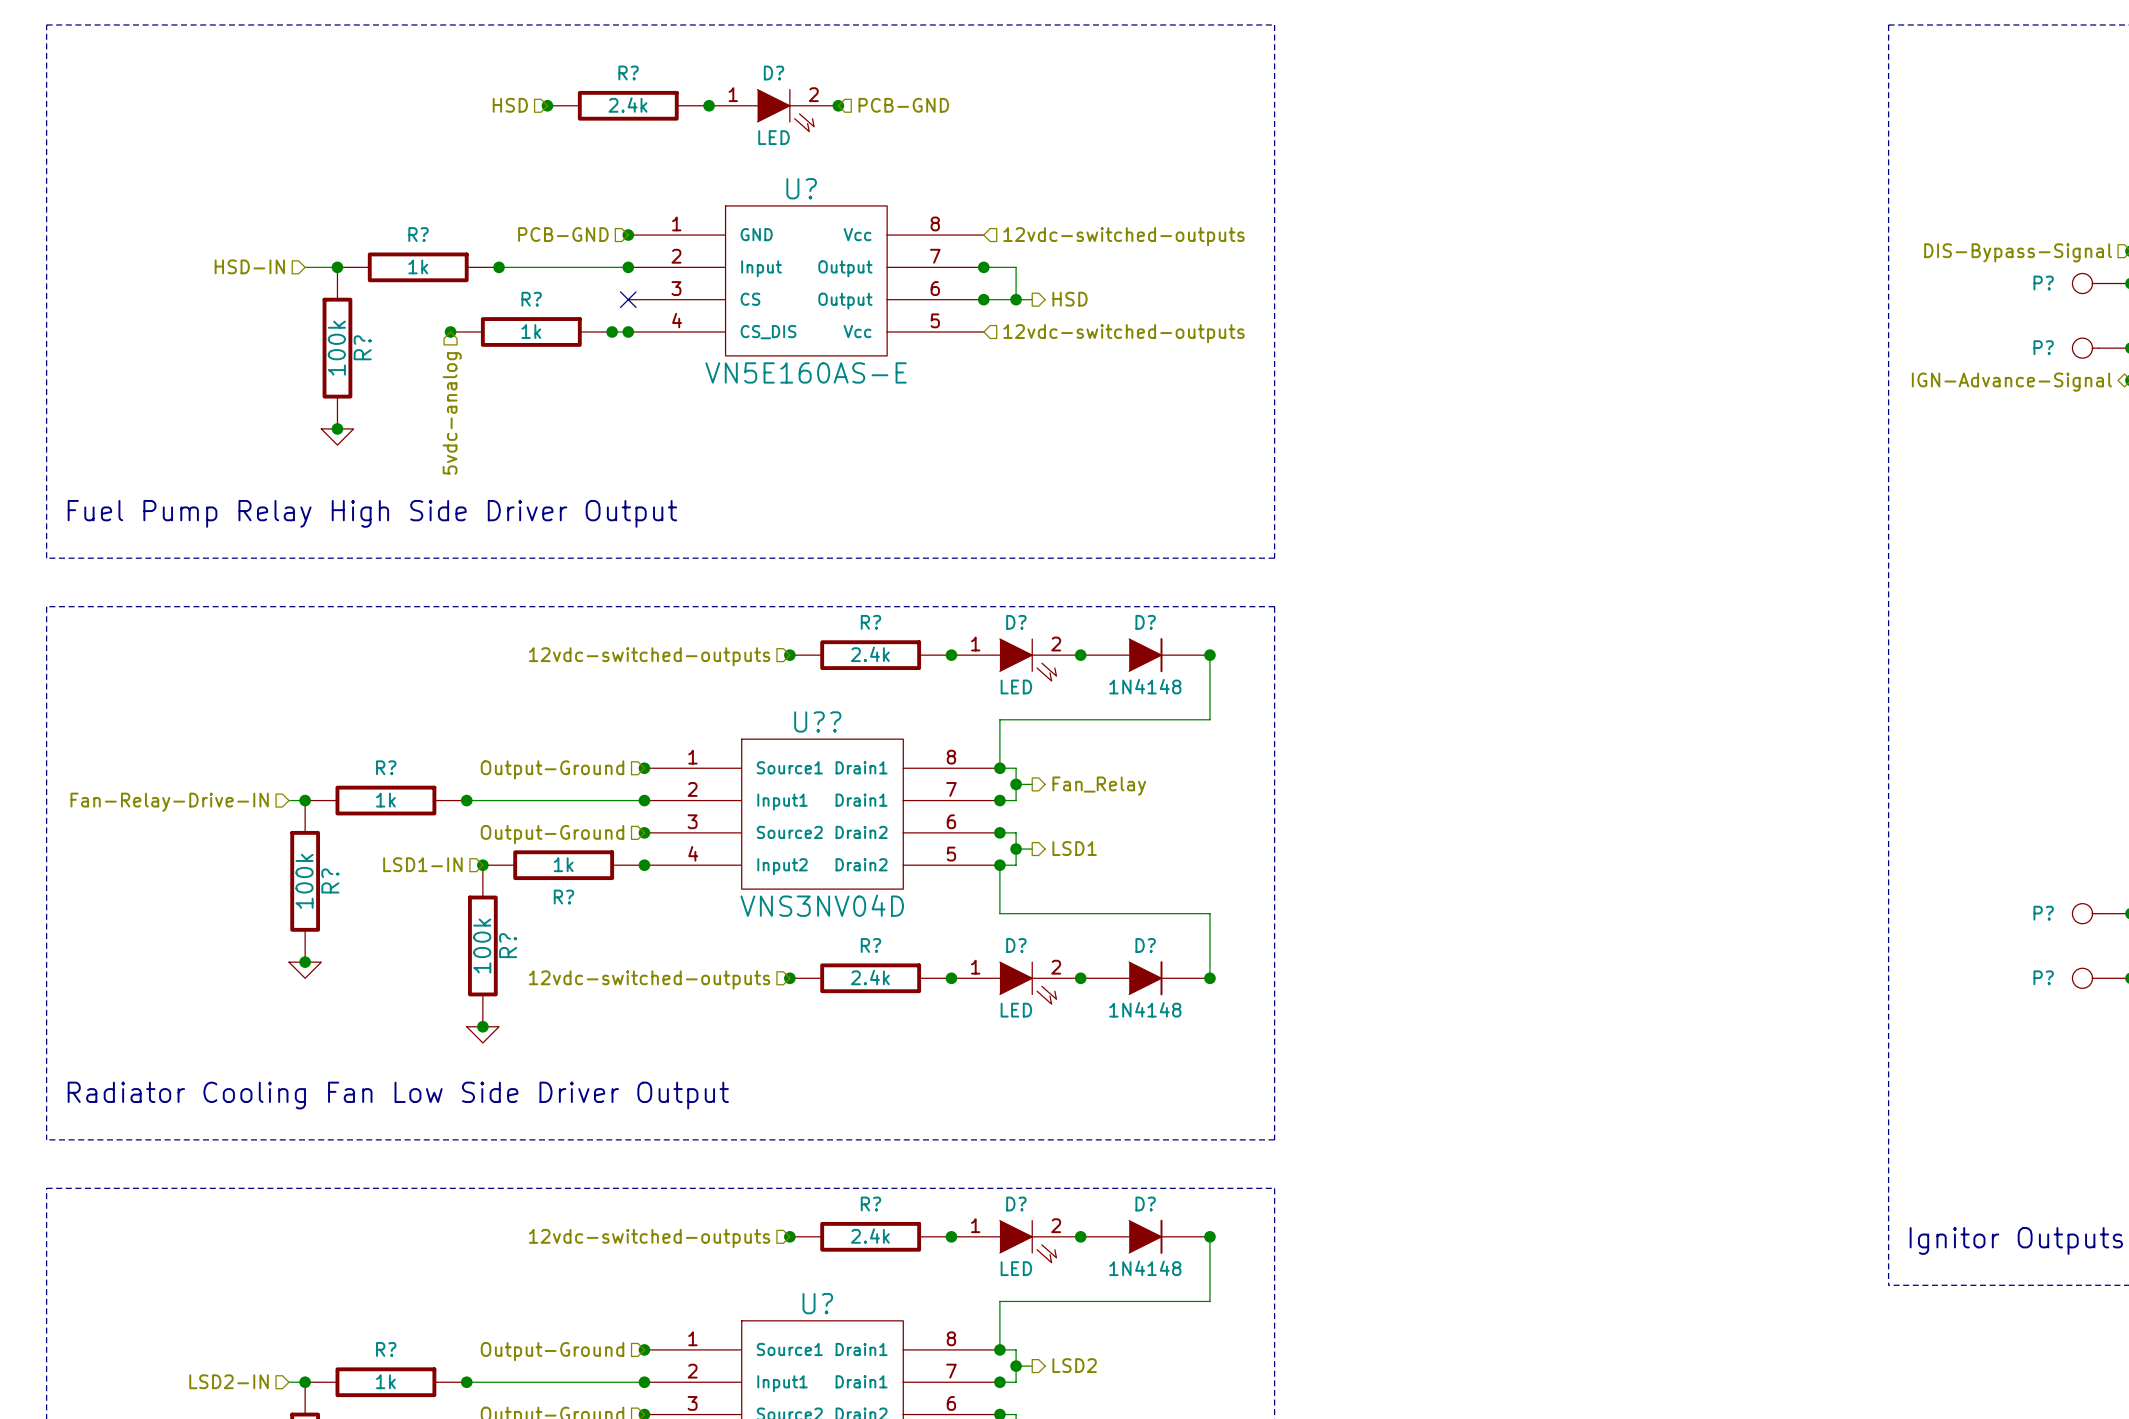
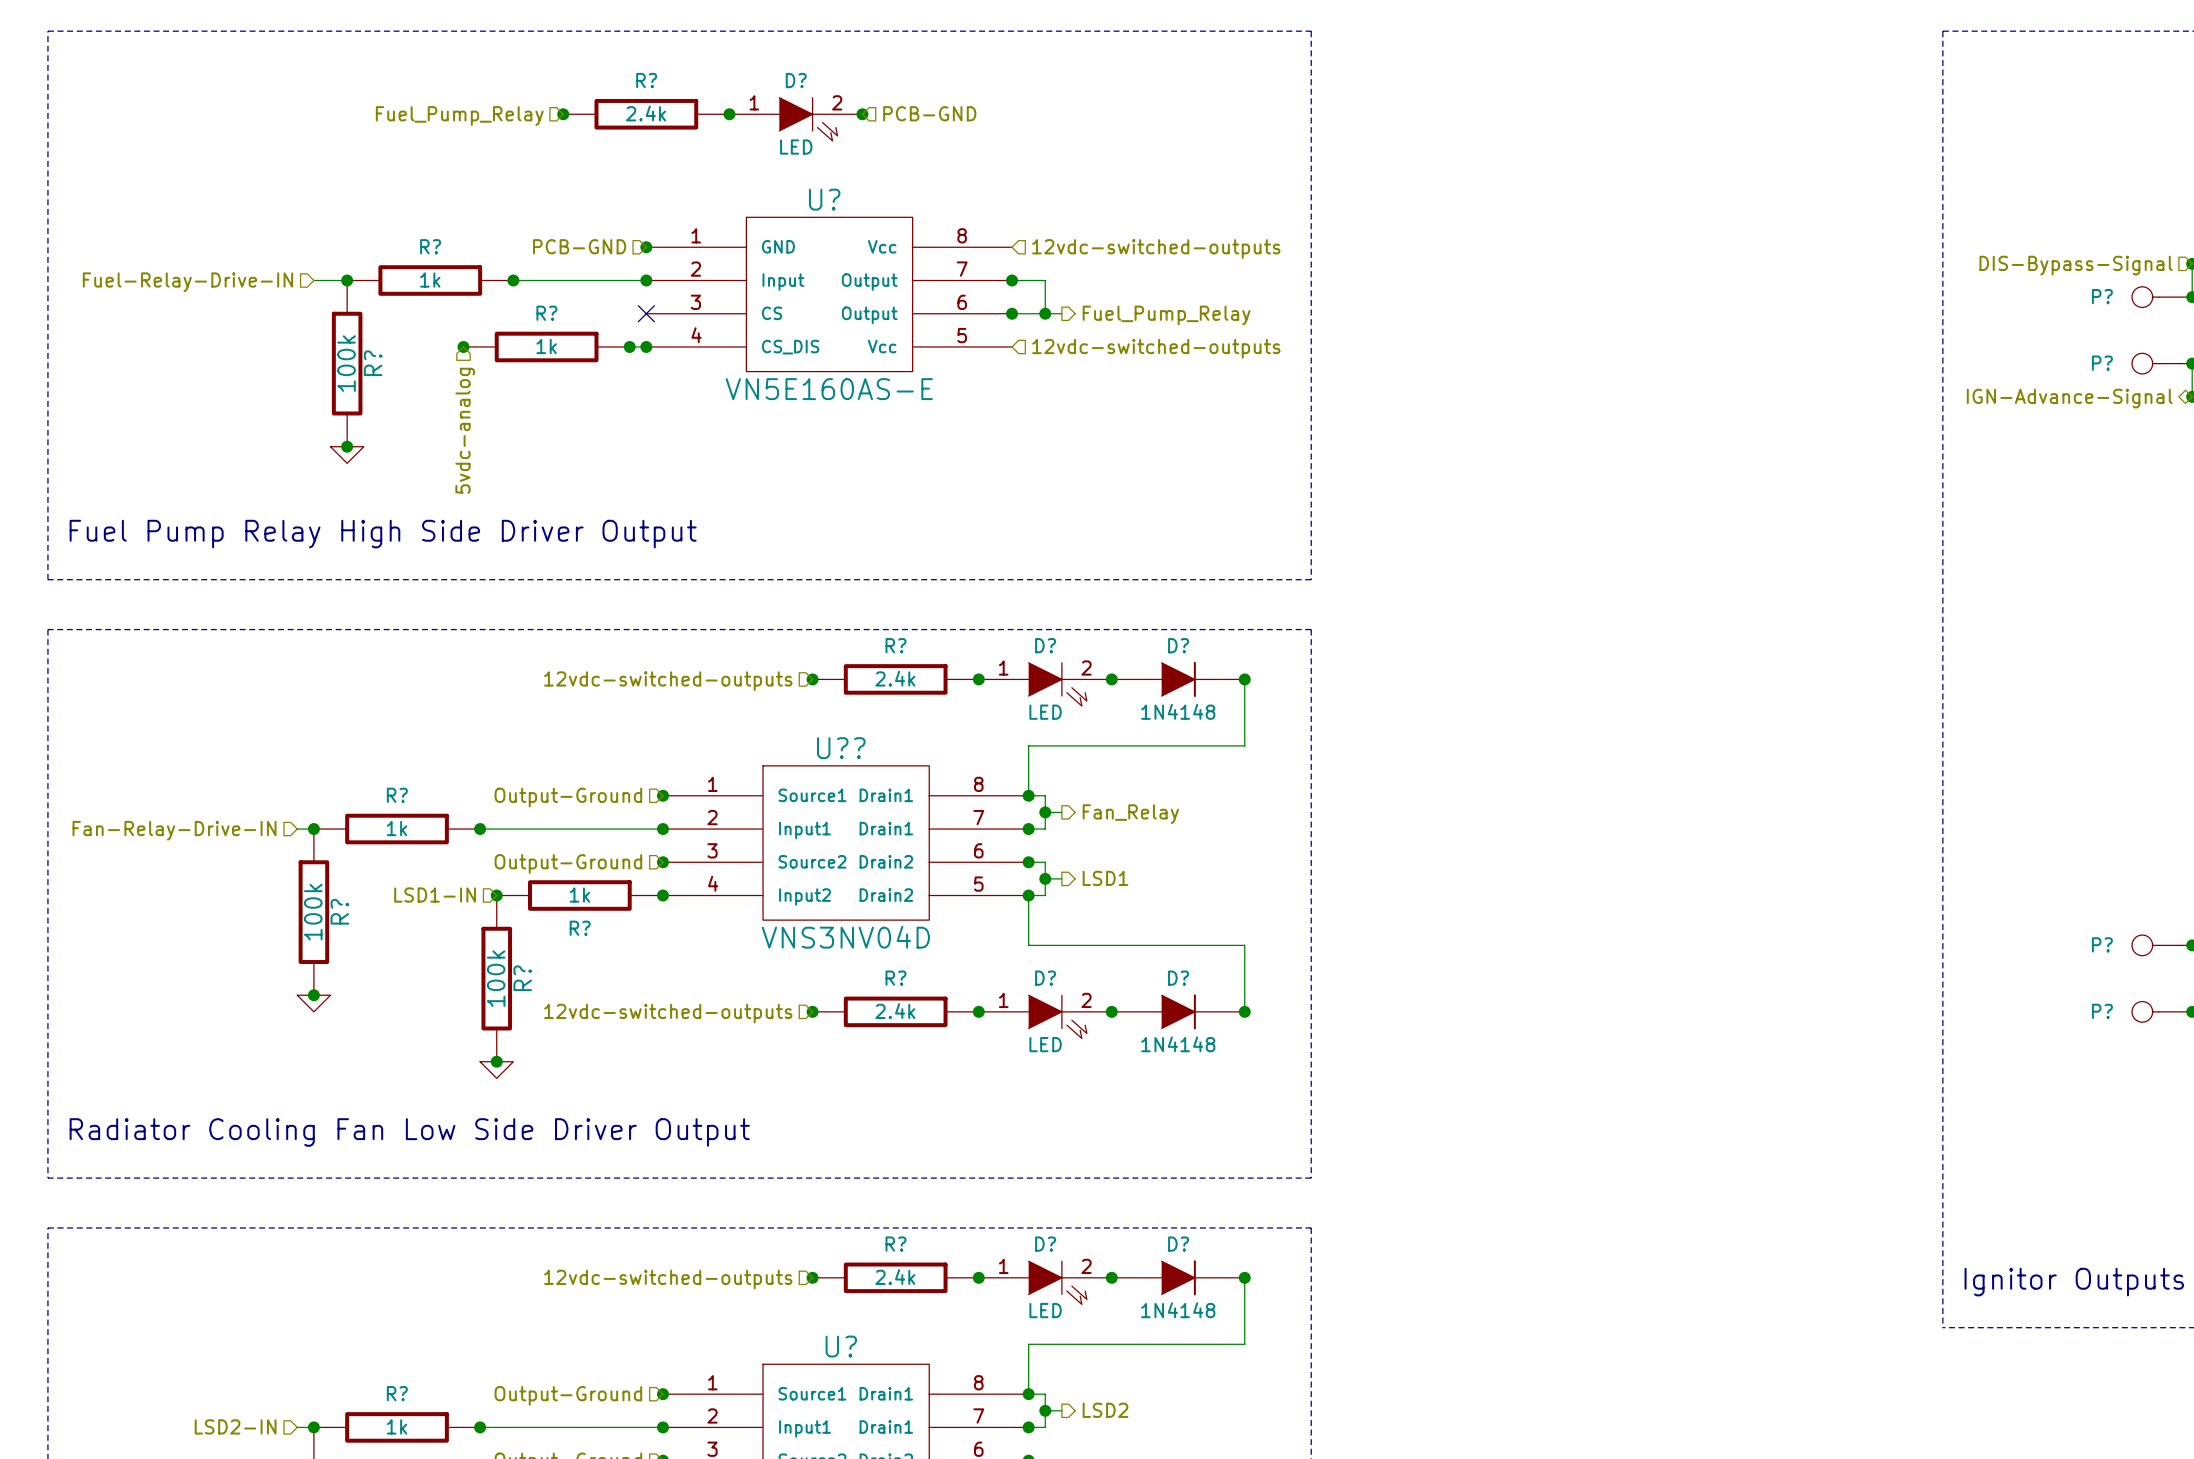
hierarchical label: HSD (510, 105) -> Fuel_Pump_Relay (459, 116)
hierarchical label: HSD-IN (249, 266) -> Fuel-Relay-Drive-IN (187, 282)
hierarchical label: HSD (1070, 299) -> Fuel_Pump_Relay (1166, 315)

